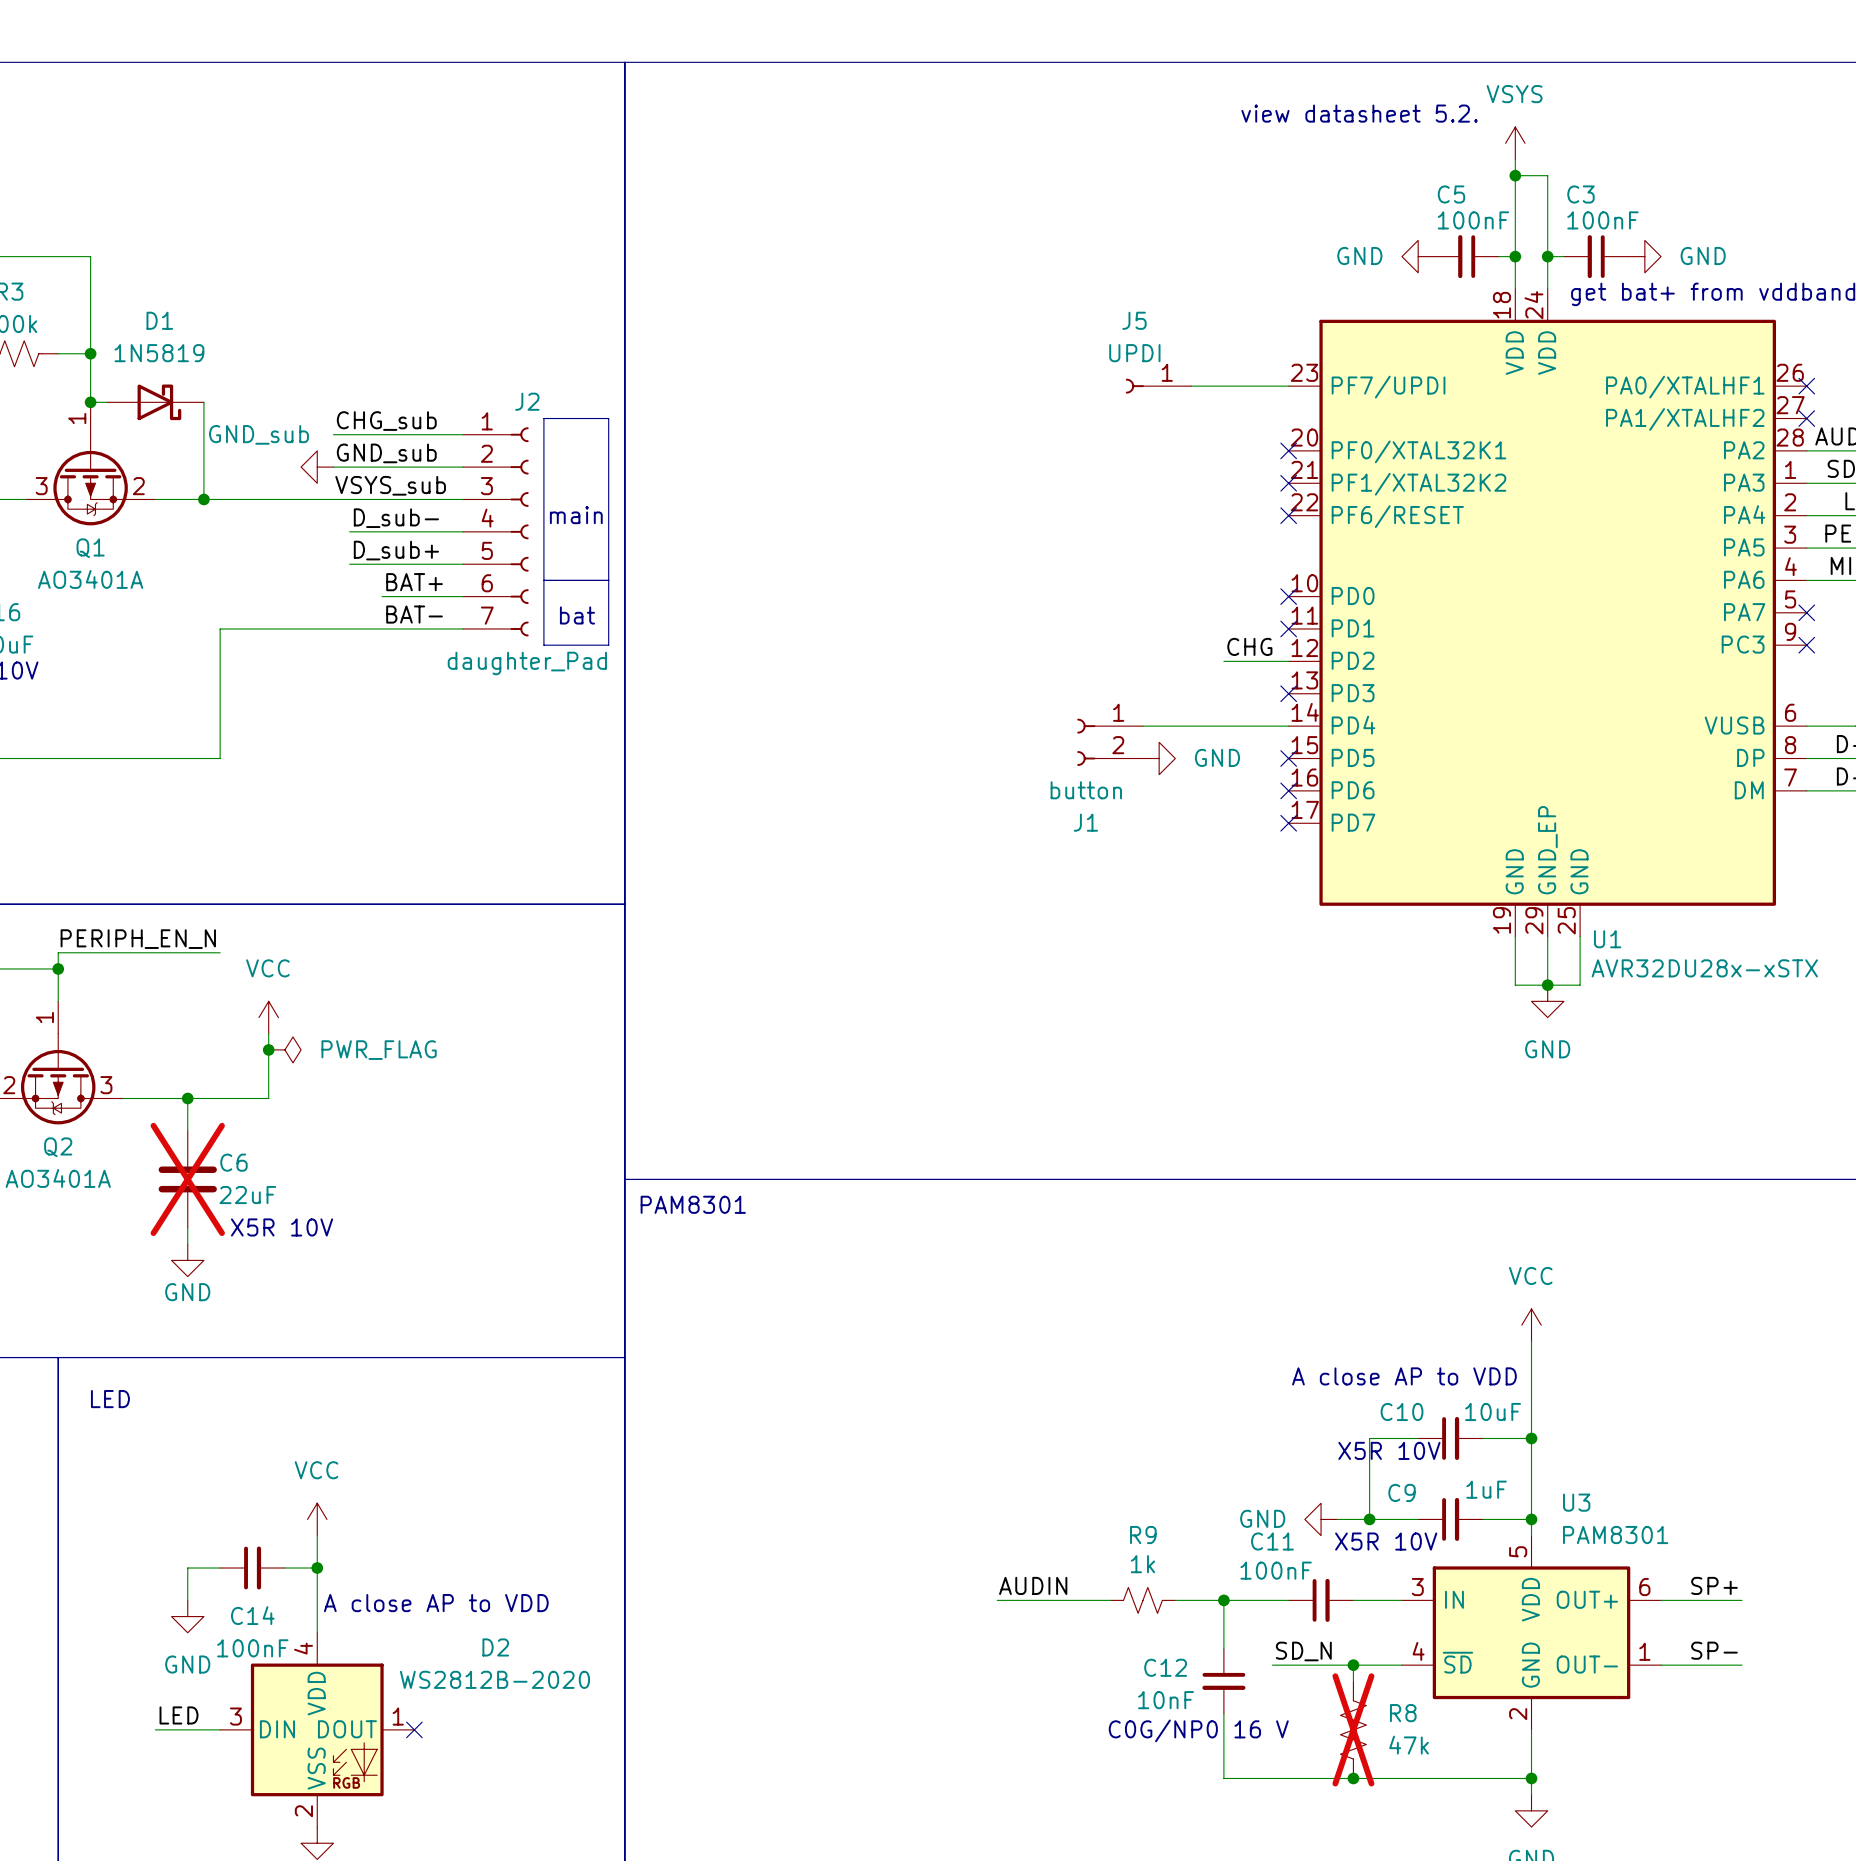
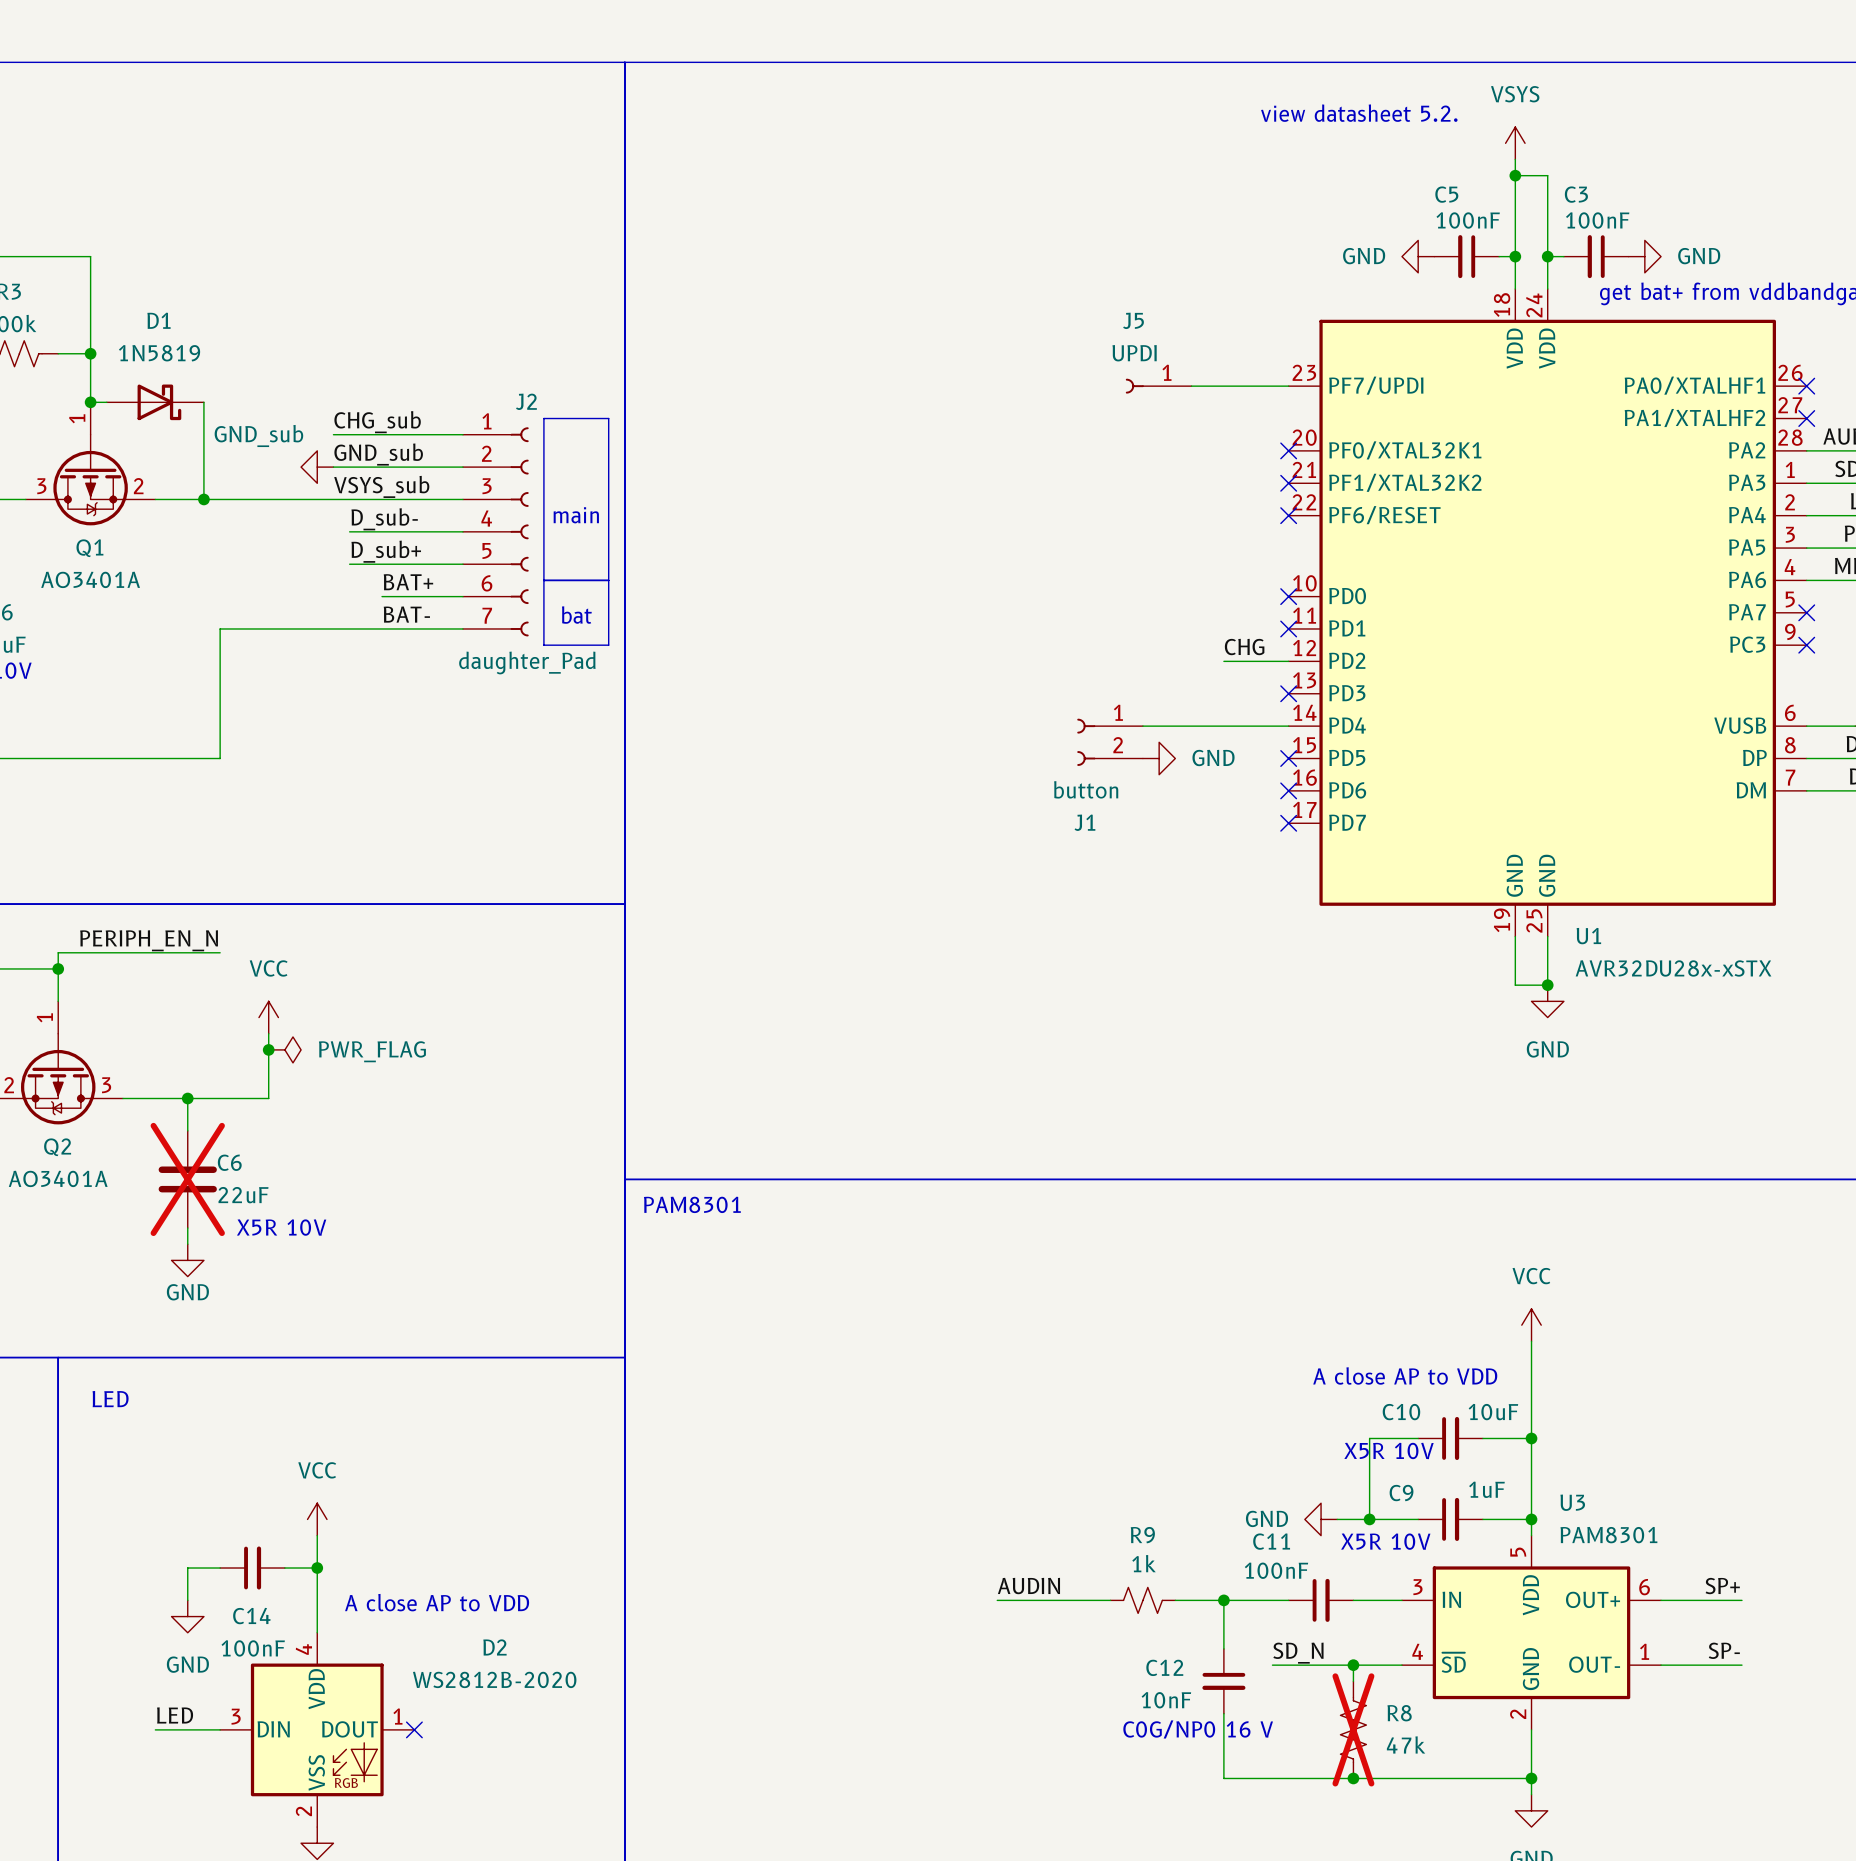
U1 symbol: [1288, 289, 1807, 937] -> [1288, 289, 1807, 937]
wire: (1580, 936) (1580, 985) (1547, 985) -> none

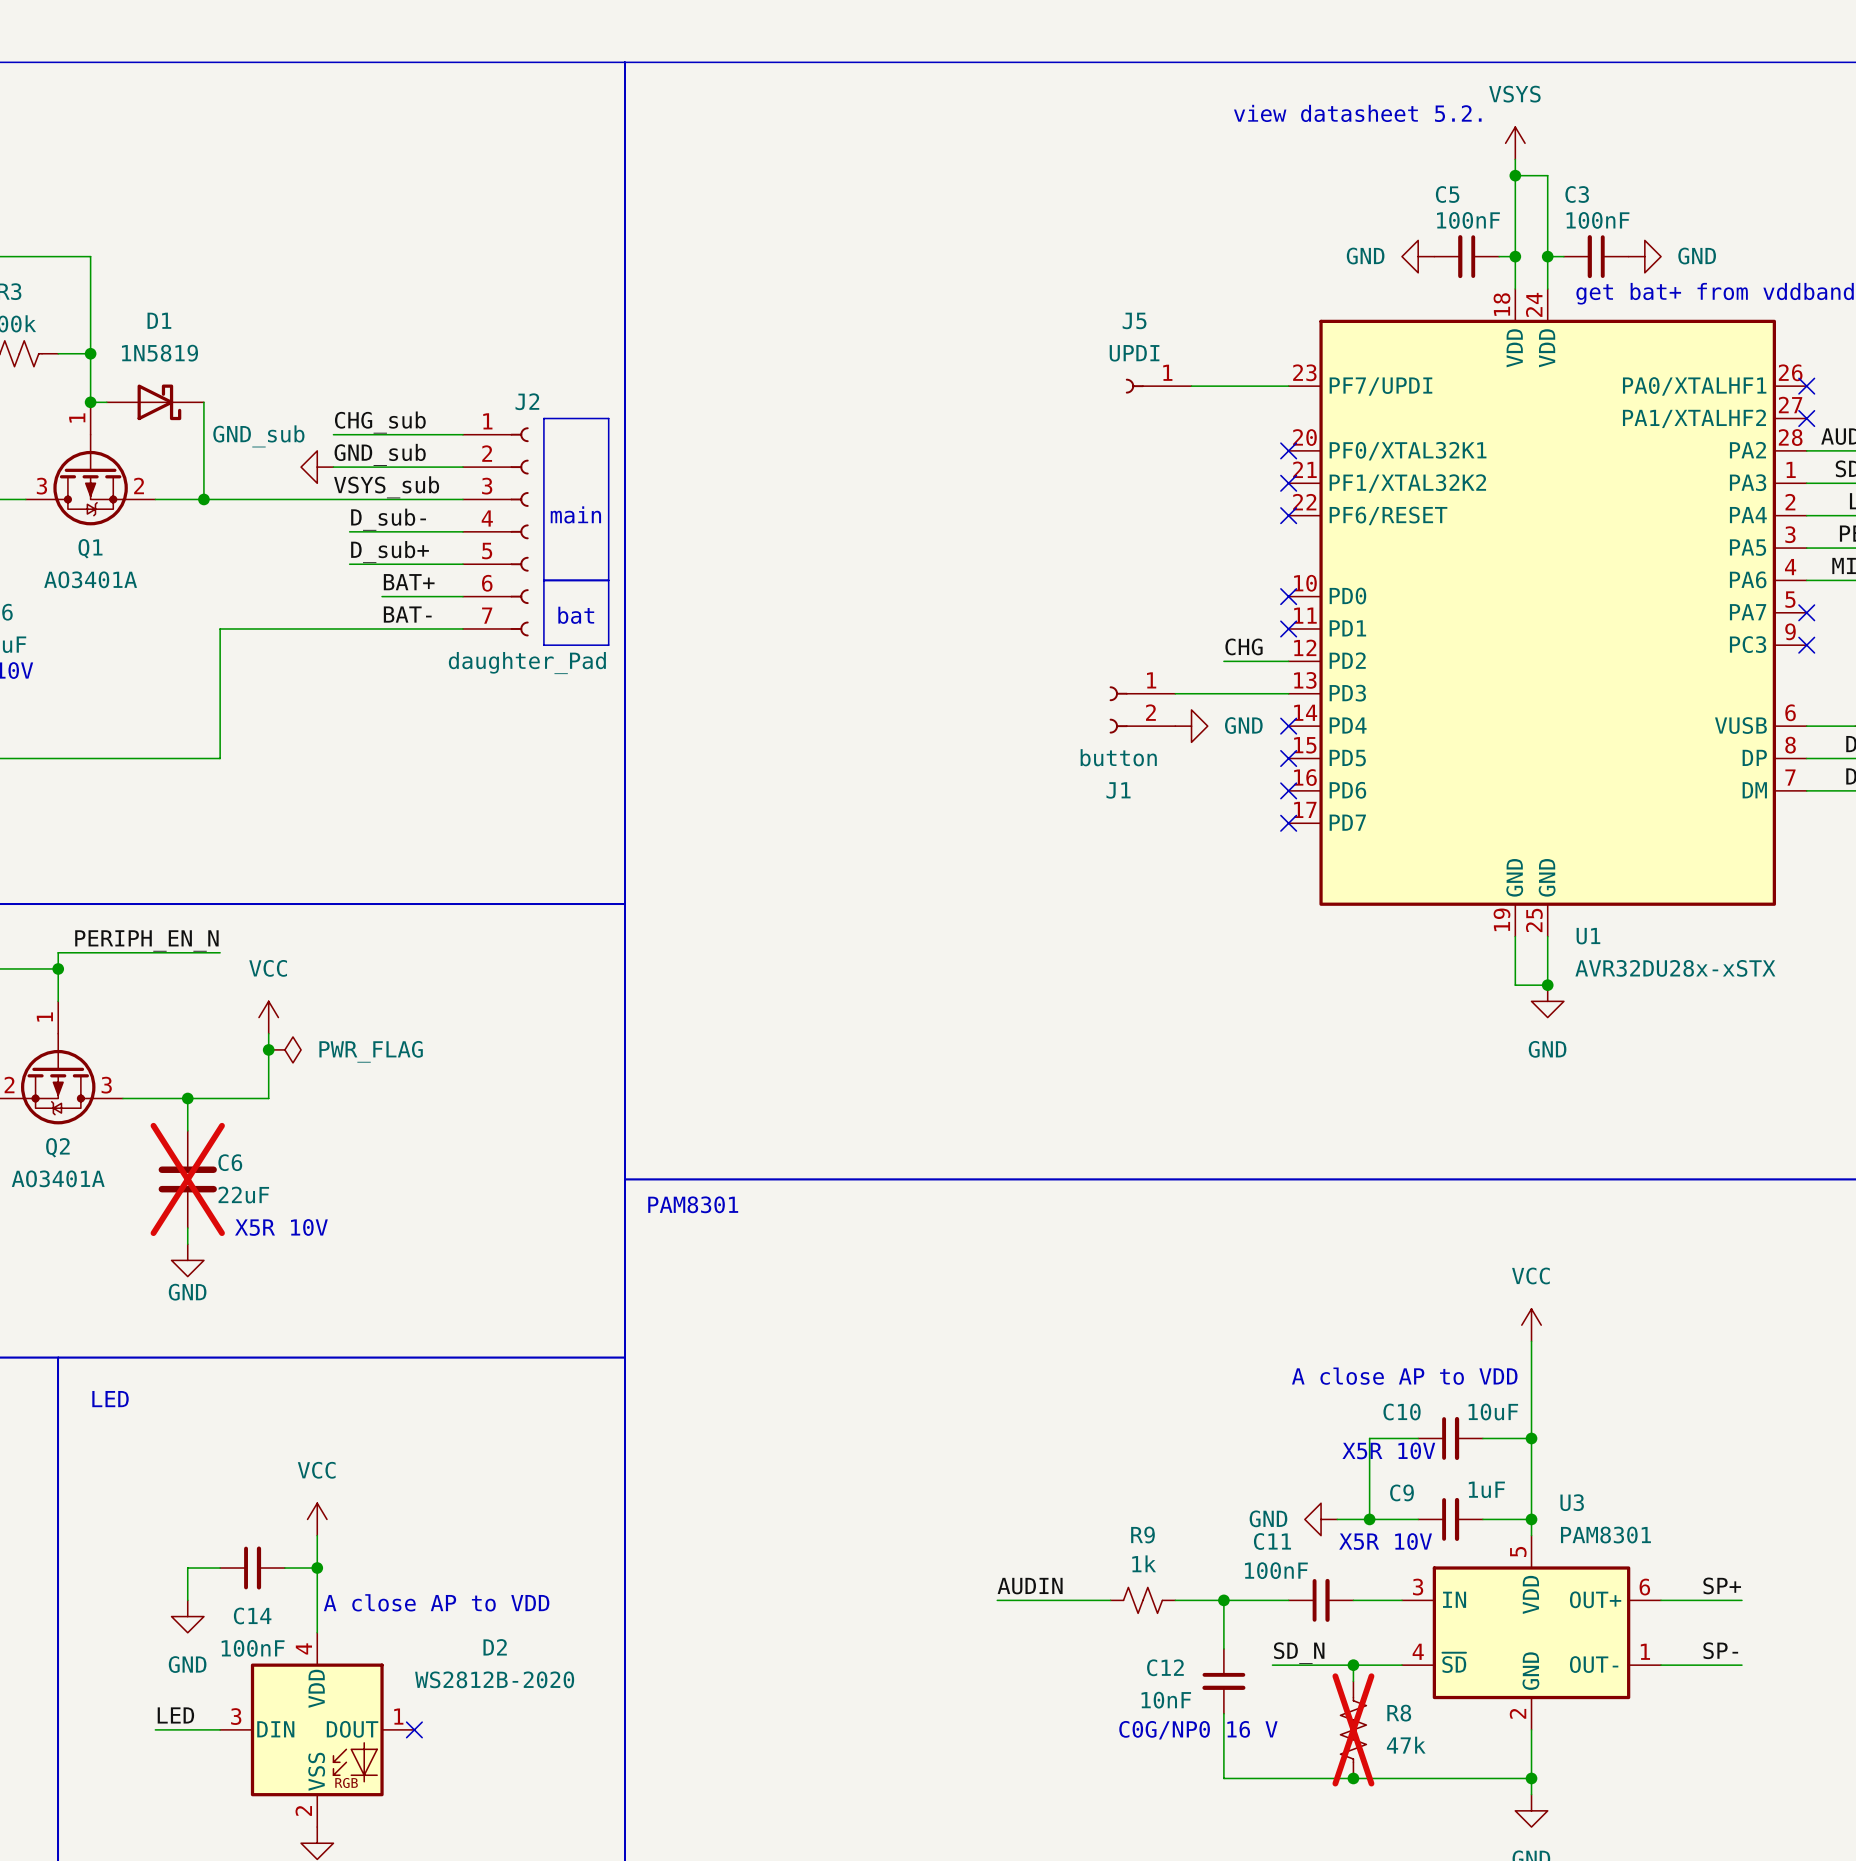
wire: none -> (1175, 693) (1288, 693)
no-connect mark position: (1288, 693) -> (1288, 726)
wire: (1142, 726) (1288, 726) -> none
J1 position: (1110, 742) -> (1142, 709)
power symbol position: GND (1159, 758) -> GND (1191, 726)

